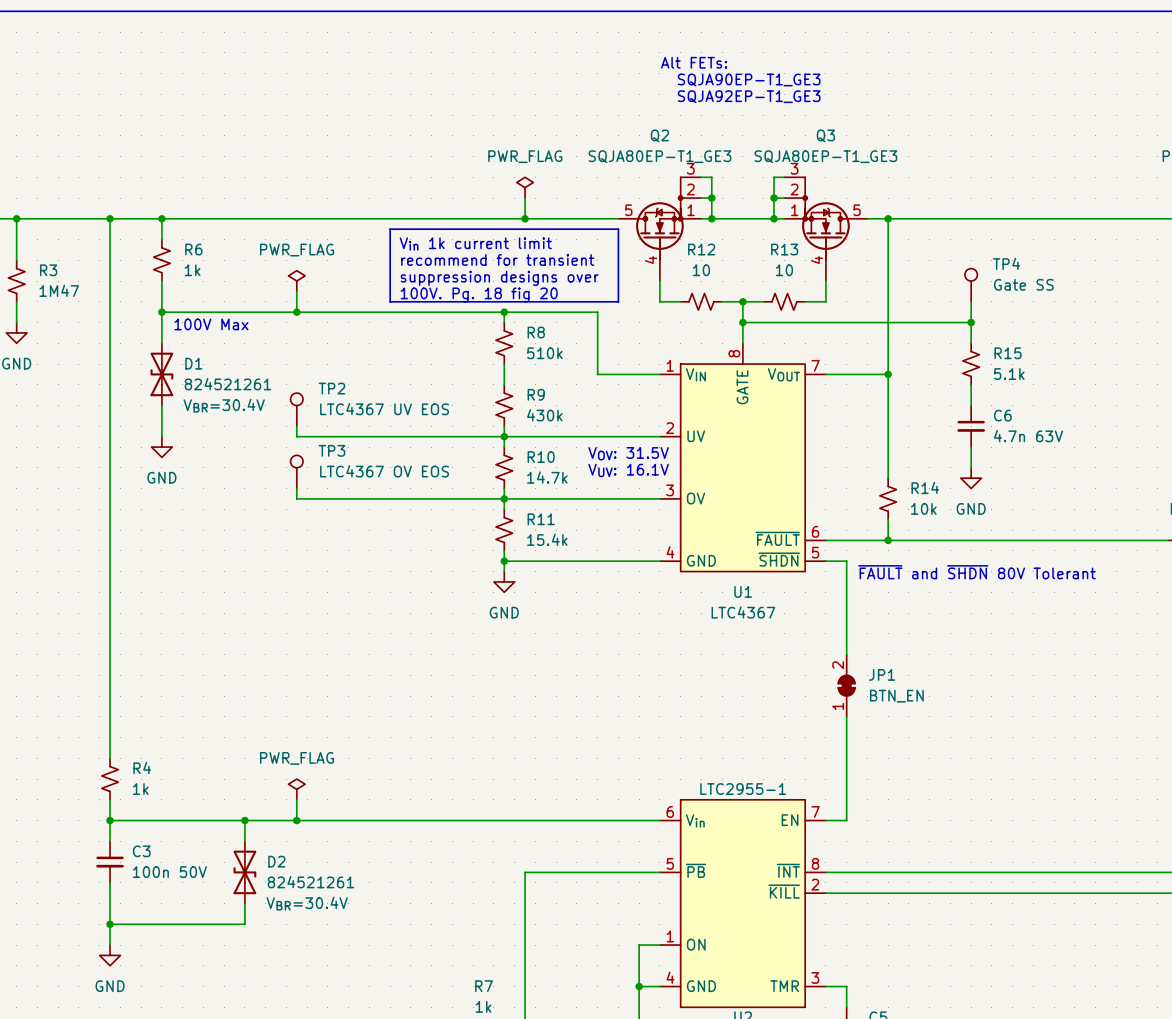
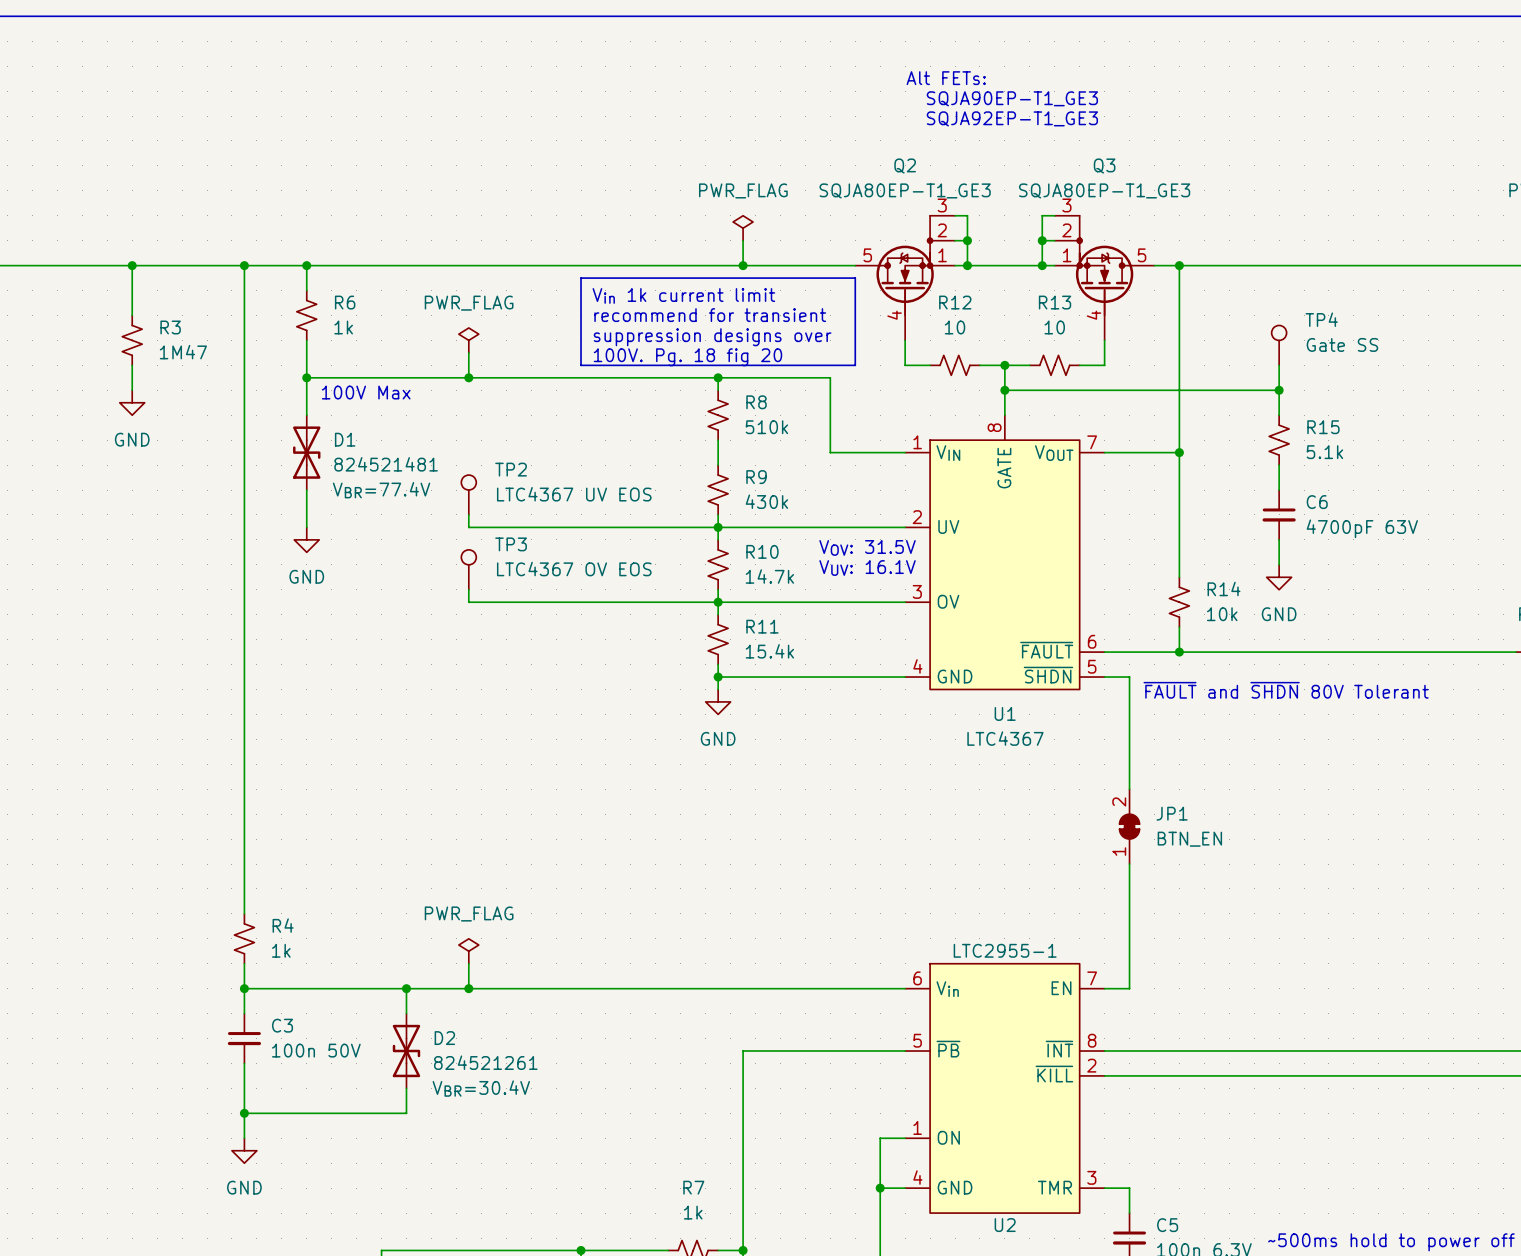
D1 value: 824521261 (227, 384) -> 824521481 (386, 464)
D1 text: VBR=30.4V (224, 405) -> VBR=77.4V (381, 490)
C6 value: 4.7n 63V (1028, 436) -> 4700pF 63V (1362, 528)

